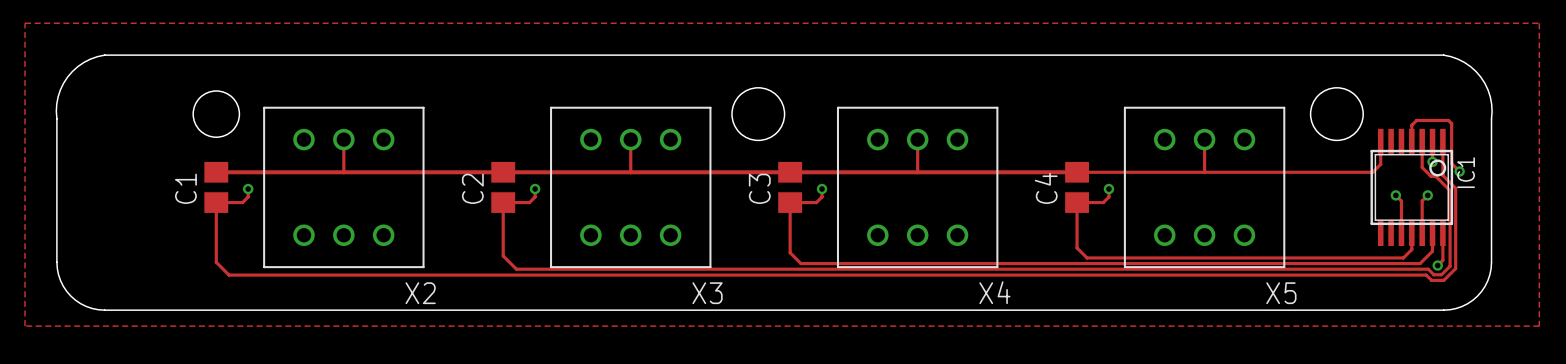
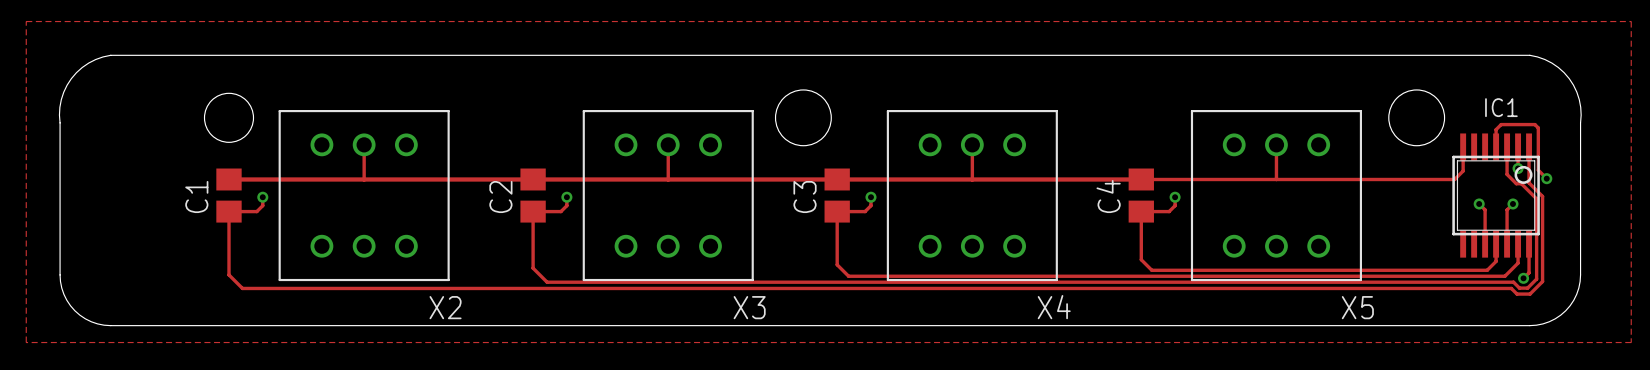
IC1 name rotation: 0° (1466, 172) -> 90° clockwise (1501, 107)
IC1 name position: IC1 (1466, 172) -> IC1 (1501, 107)

